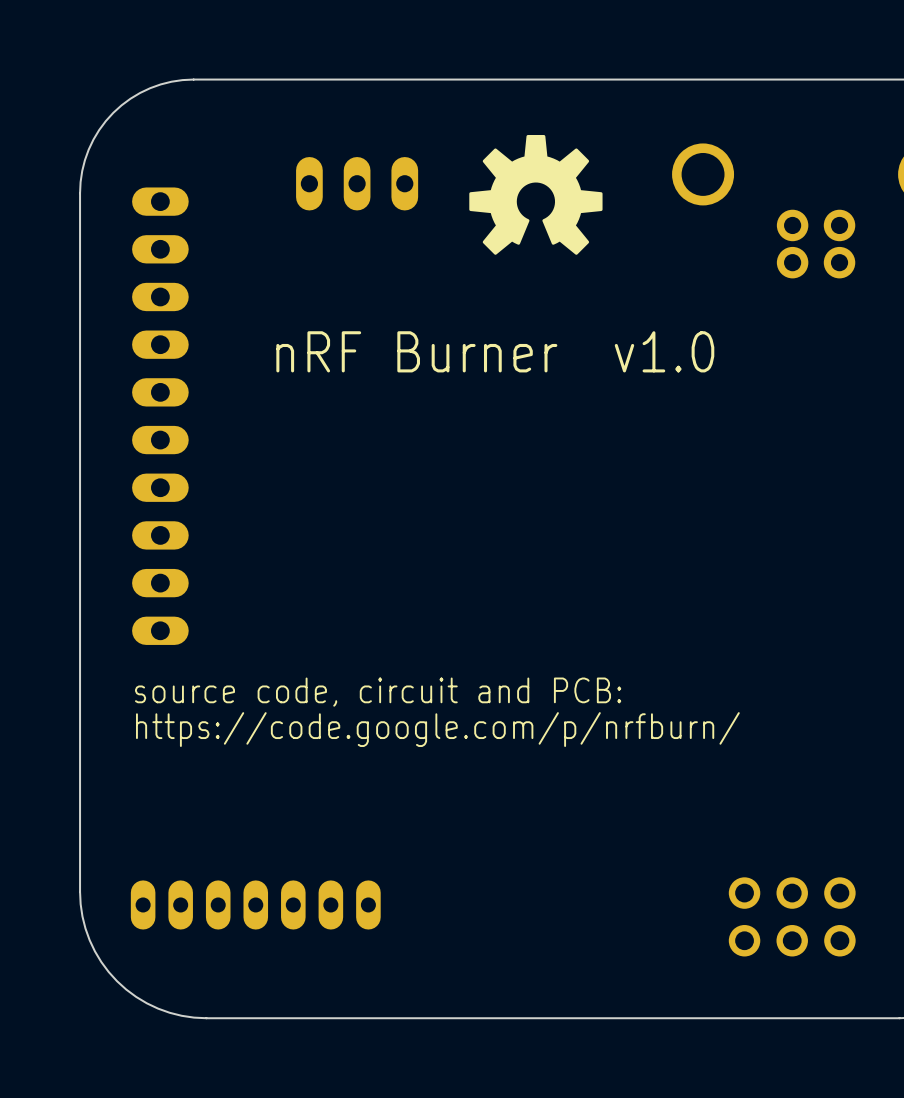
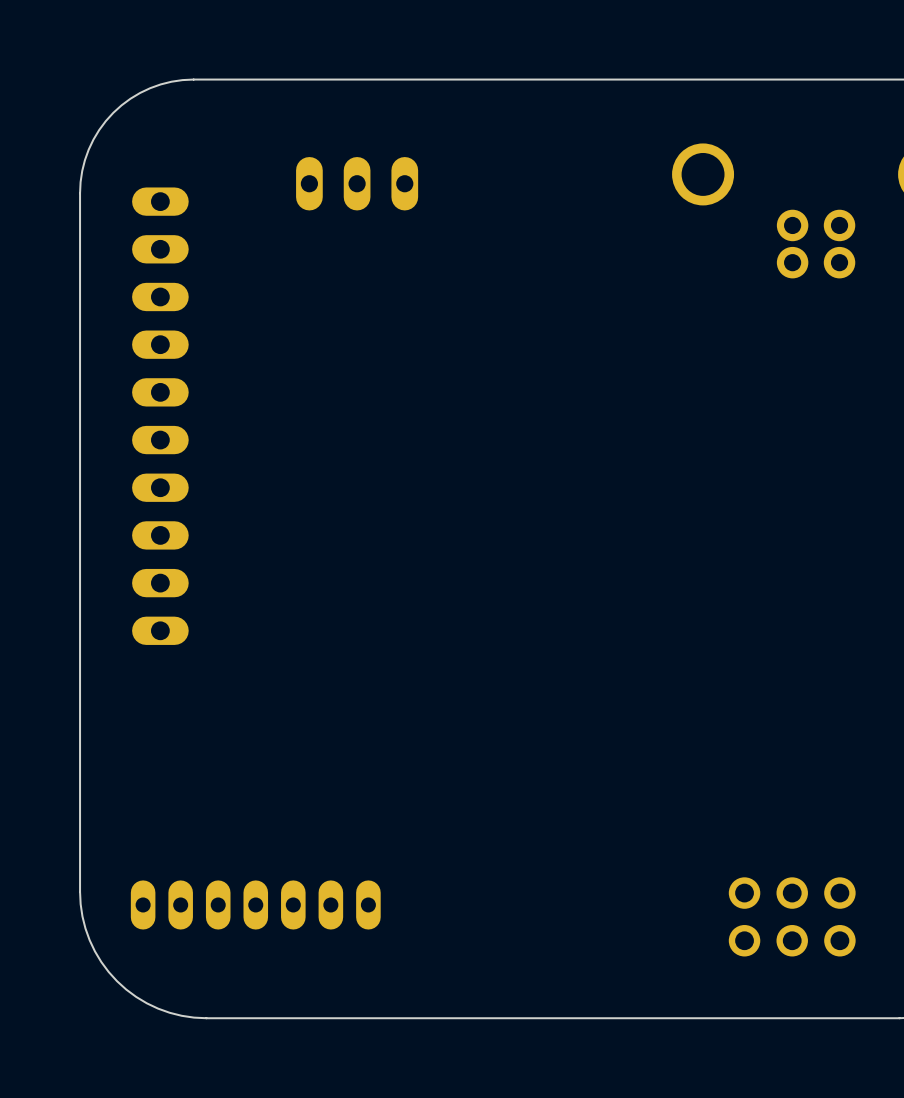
drawing: [469, 134, 603, 255] -> none
text: nRF Burner v1.0 (495, 351) -> none
text: source code, circuit and PCB: (378, 692) -> none
text: https://code.google.com/p/nrfburn/ (437, 729) -> none

